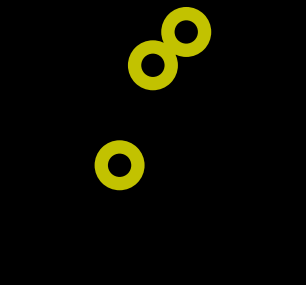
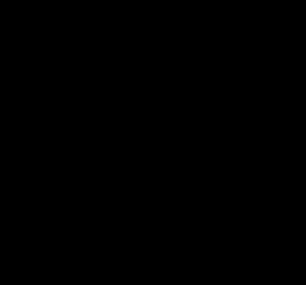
part: (186, 31) -> none
part: (152, 65) -> none
part: (119, 165) -> none

